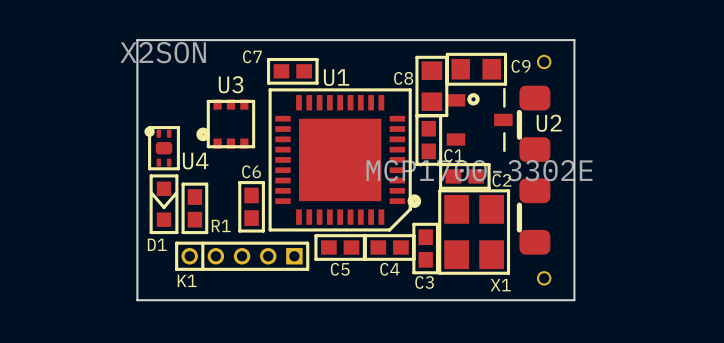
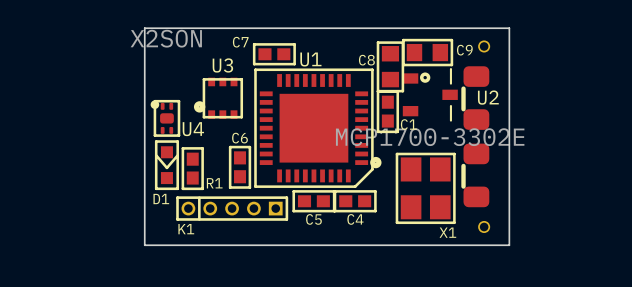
C2: (464, 176) -> none
C3: (425, 248) -> none

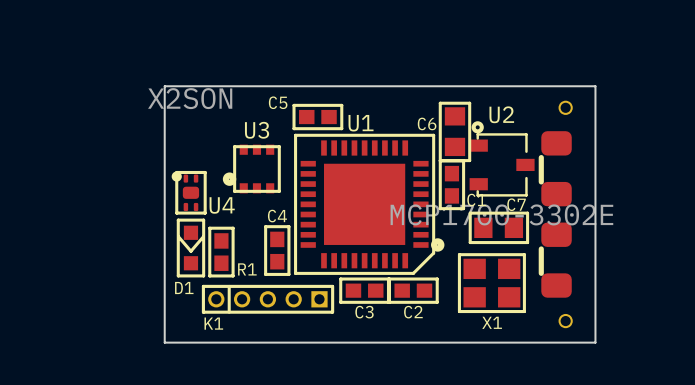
C7 name: C7 (240, 42) -> C5 (278, 102)
C9: (427, 52) -> none
C8 name: C8 (366, 60) -> C6 (427, 123)
U2 footprint: [402, 68, 458, 122] -> [469, 121, 535, 197]
U2 name position: U2 (488, 97) -> U2 (501, 114)
C6 name: C6 (239, 138) -> C4 (277, 216)
C7: none -> (498, 227)
X1 footprint: [395, 152, 456, 225] -> [457, 253, 526, 314]
C5 name: C5 (313, 219) -> C3 (364, 312)
C4 name: C4 (355, 219) -> C2 (413, 312)

